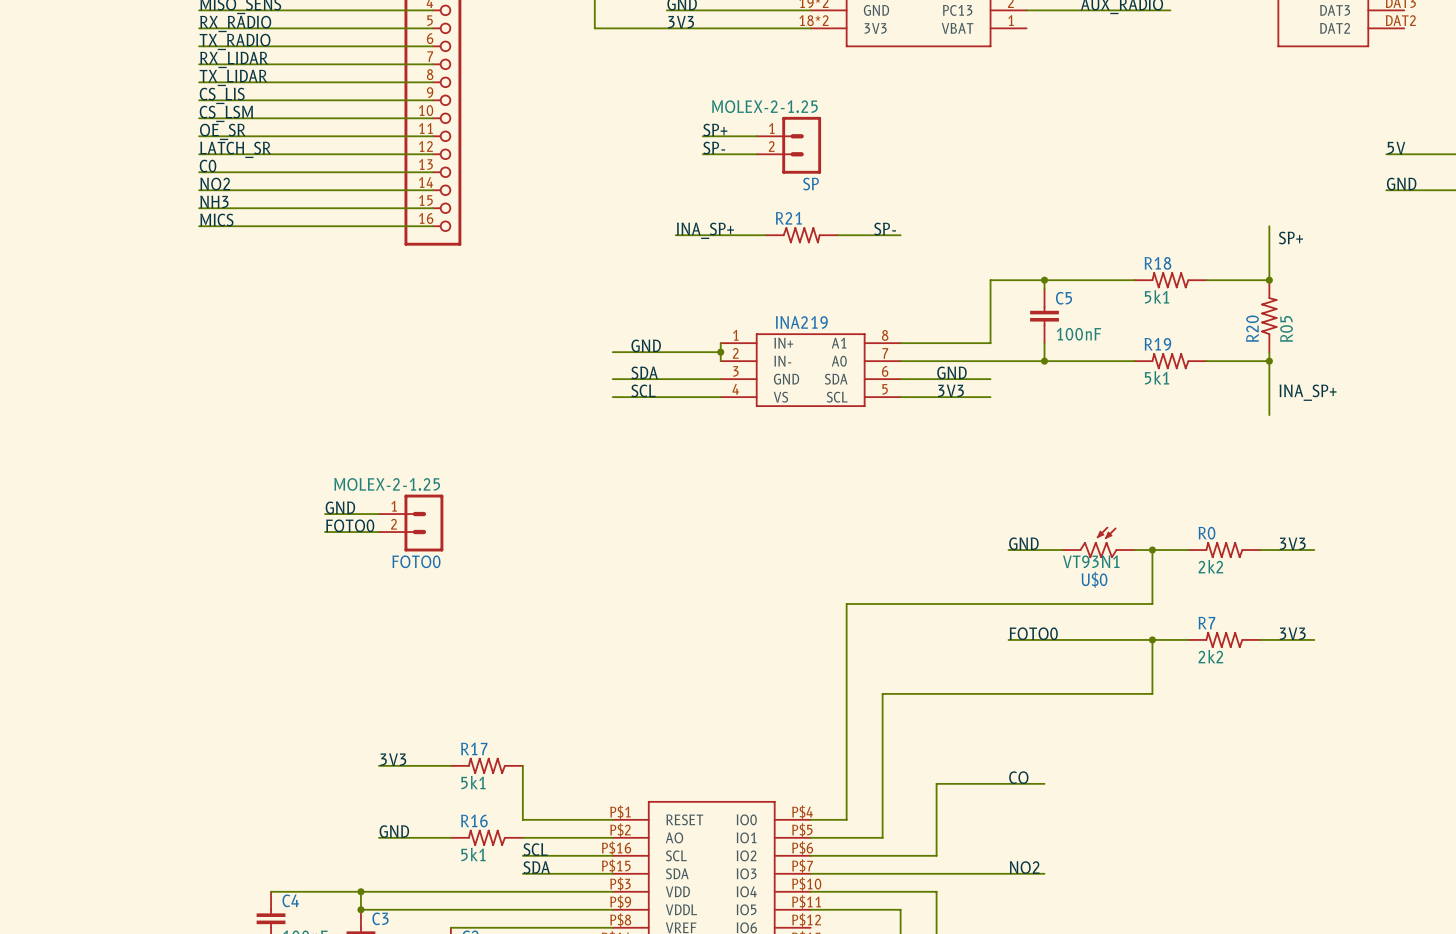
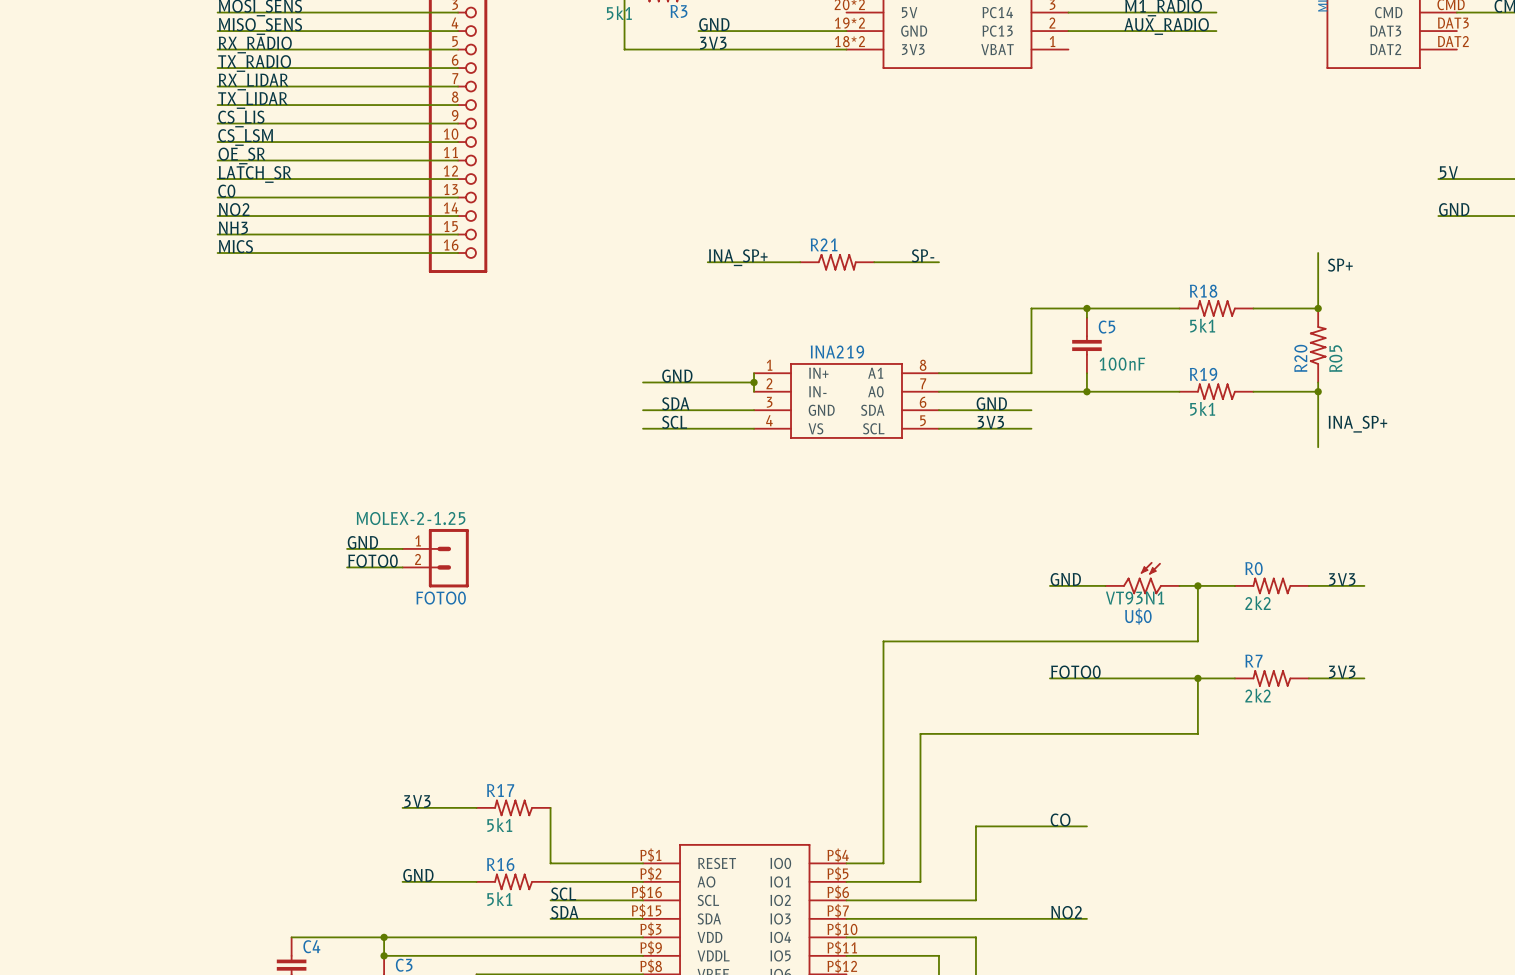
label: SP+ (715, 130) -> none
wire: (702, 136) (756, 136) -> none
SP: MOLEX-2-1.25 (788, 145) -> none
label: SP- (714, 148) -> none
wire: (702, 154) (756, 154) -> none

